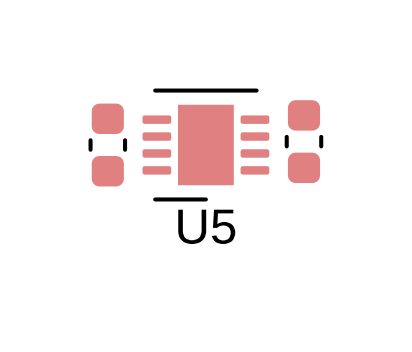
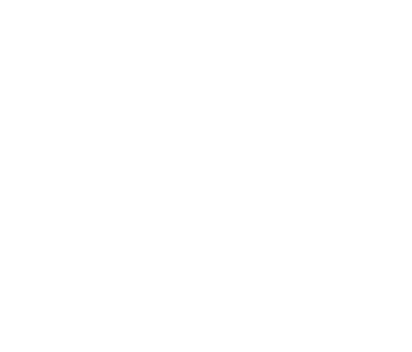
part: (303, 141) -> none
part: (107, 145) -> none
U5: (205, 145) -> none

